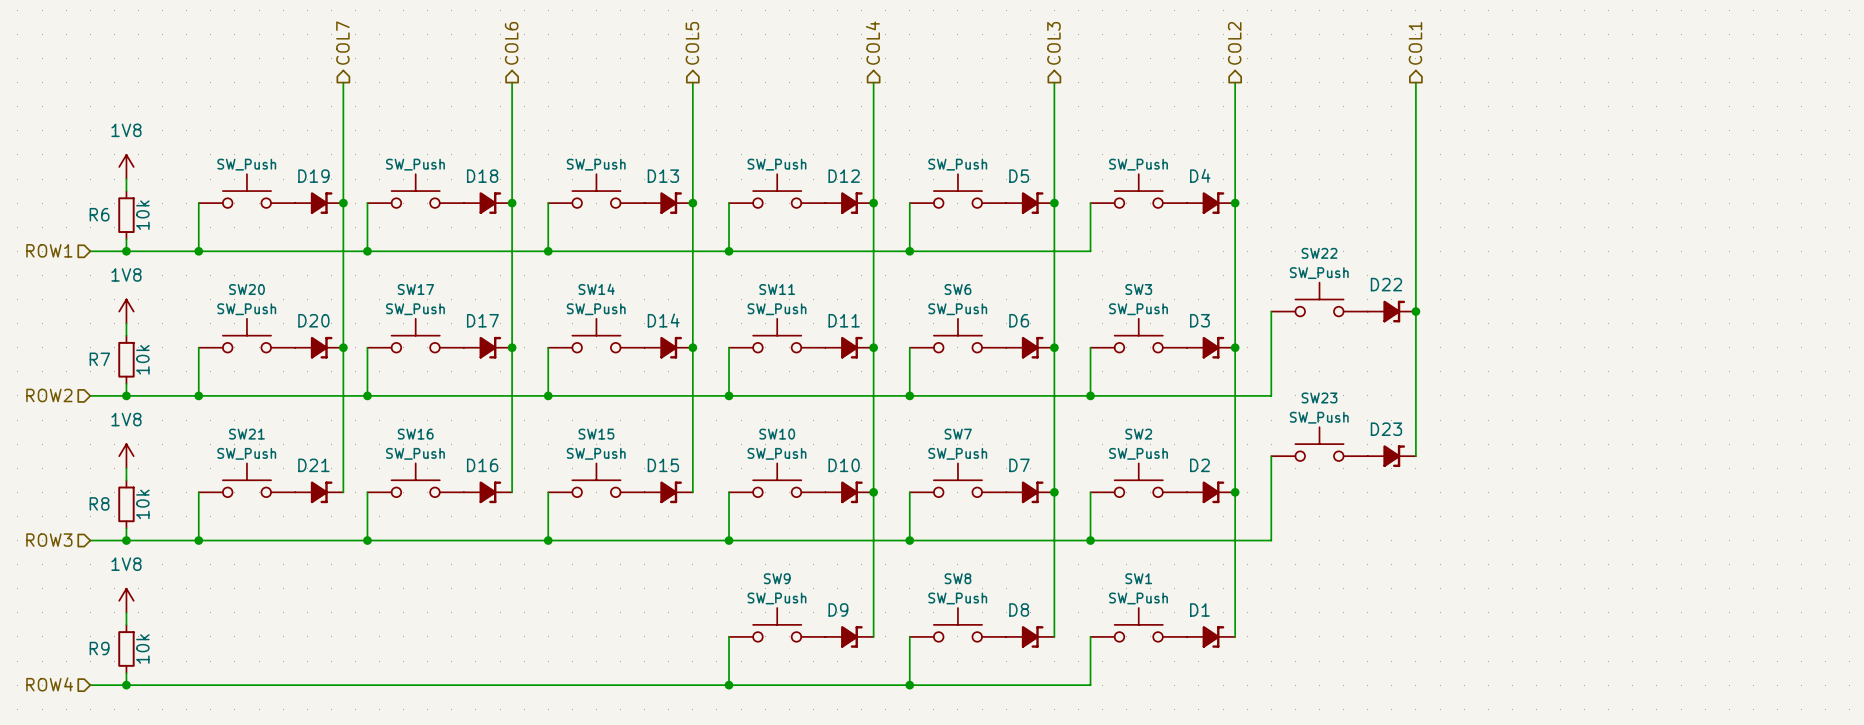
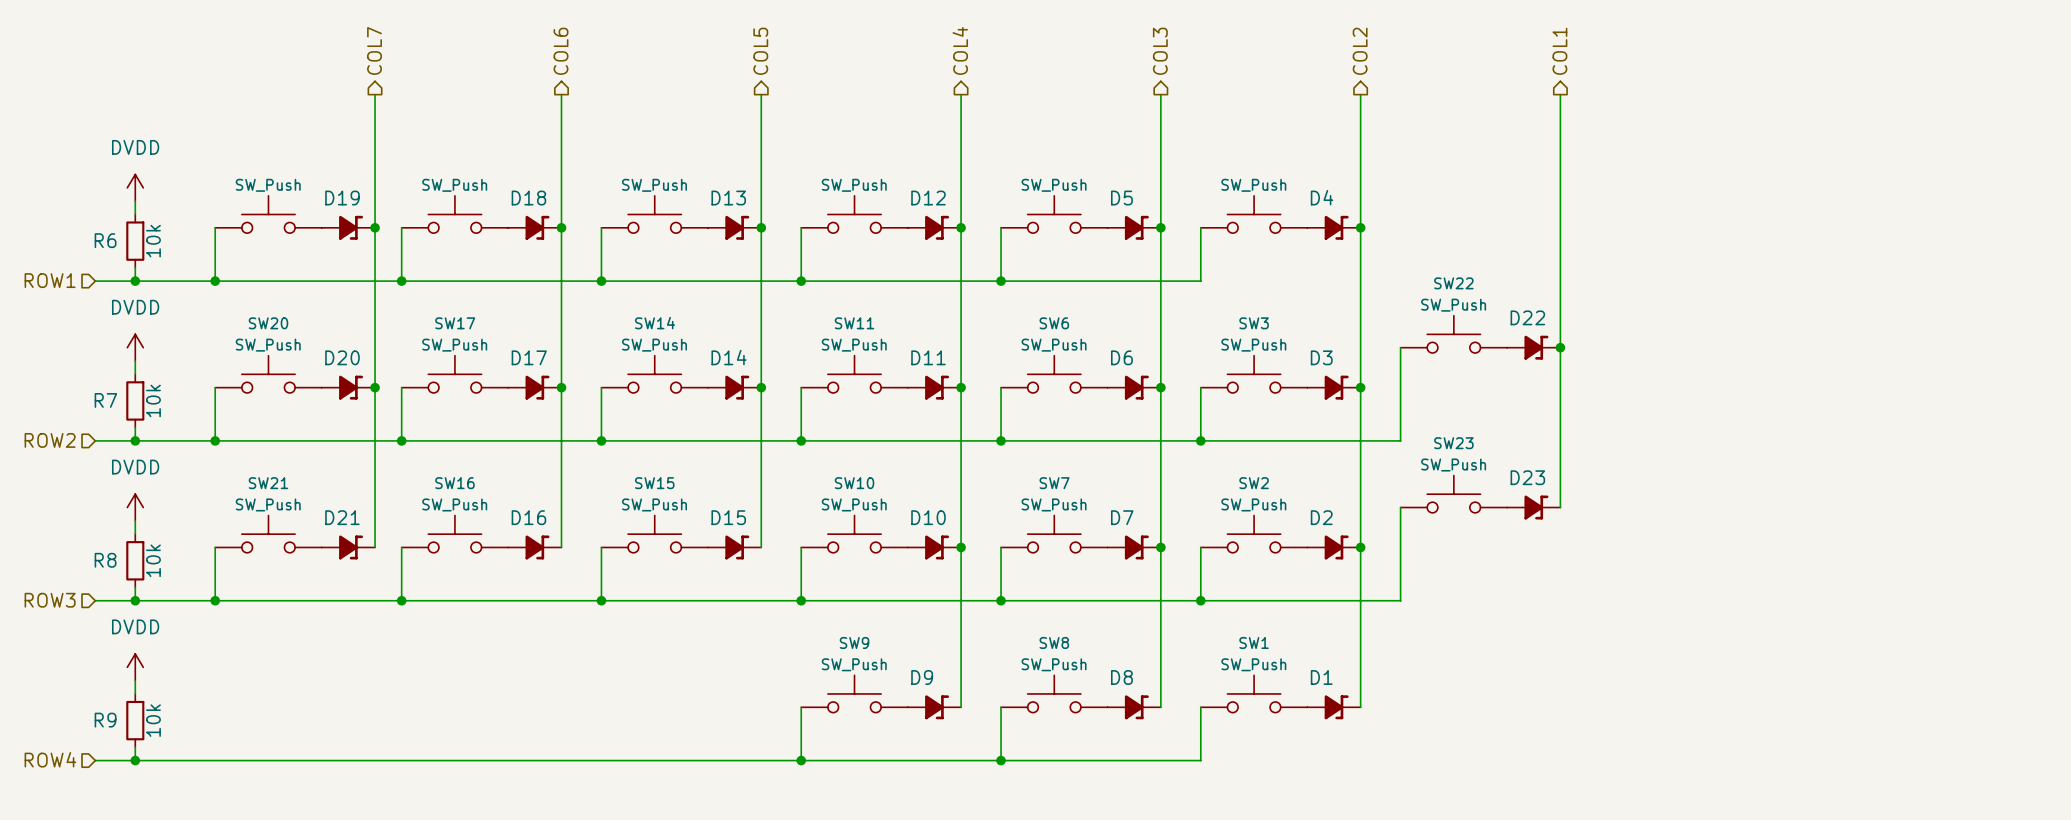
power symbol: 1V8 (126, 166) -> DVDD (135, 187)
power symbol: 1V8 (126, 311) -> DVDD (135, 347)
power symbol: 1V8 (126, 456) -> DVDD (135, 507)
power symbol: 1V8 (126, 600) -> DVDD (135, 667)

